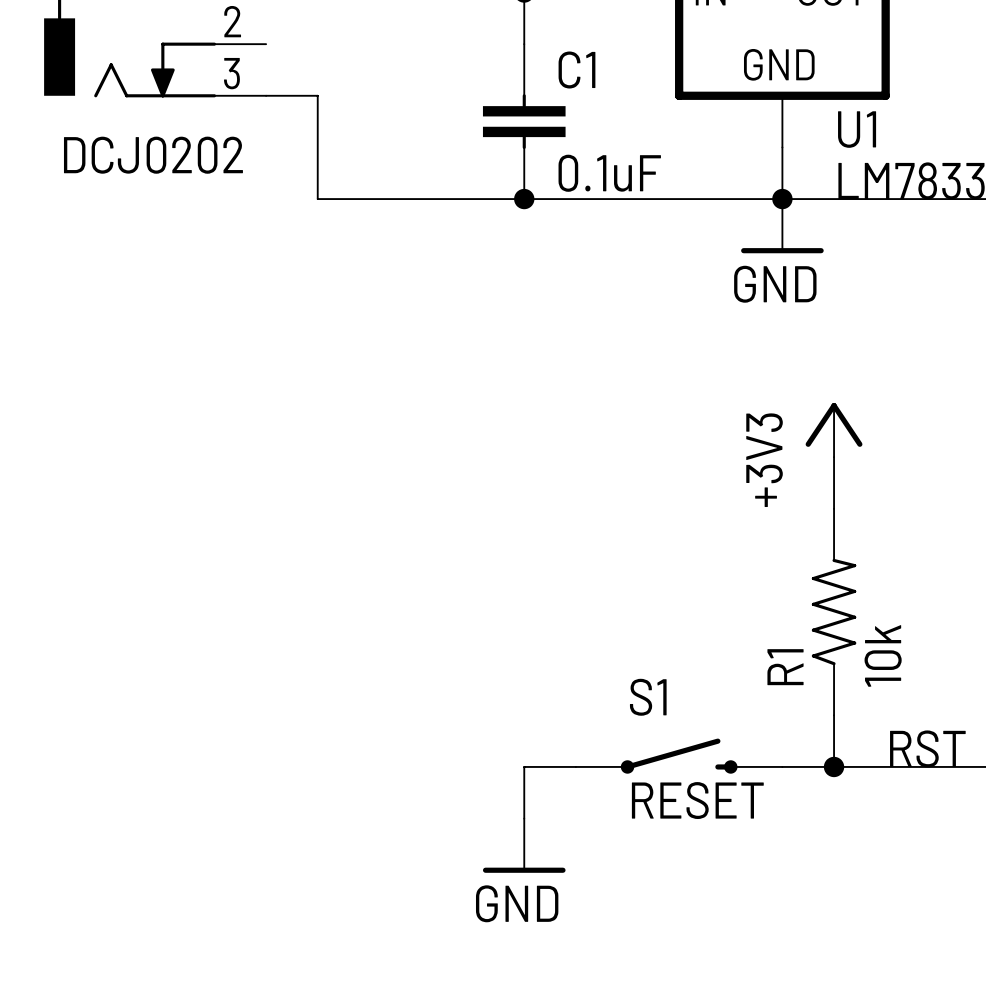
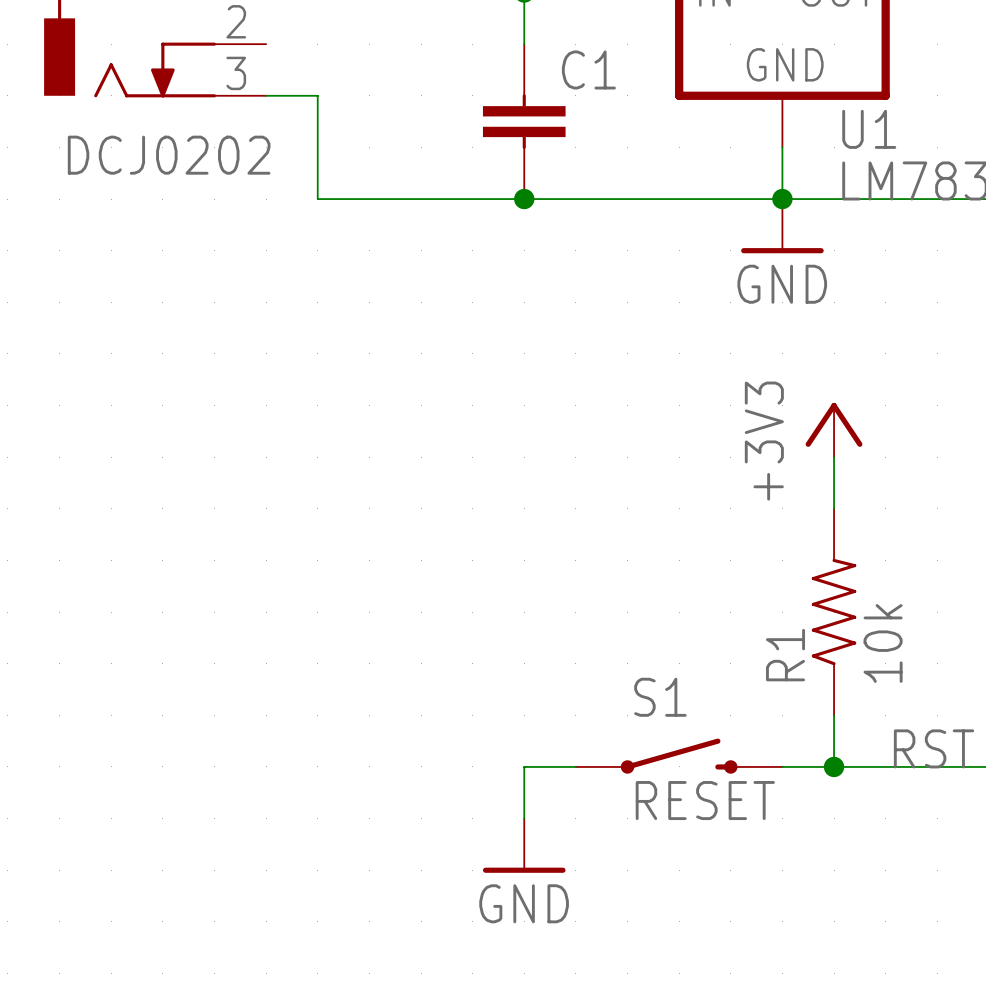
C1 value: 0.1uF (609, 173) -> none

